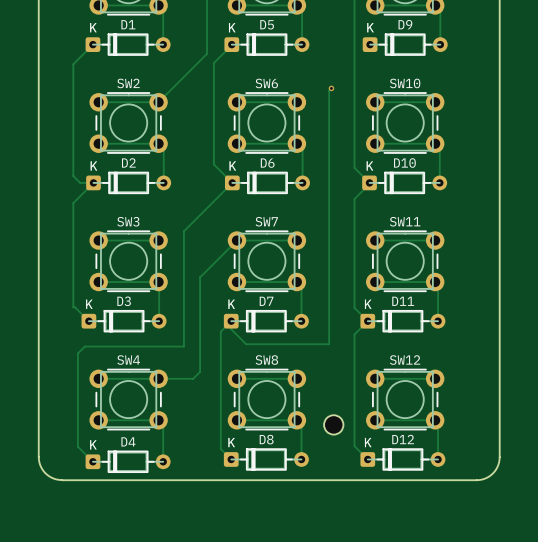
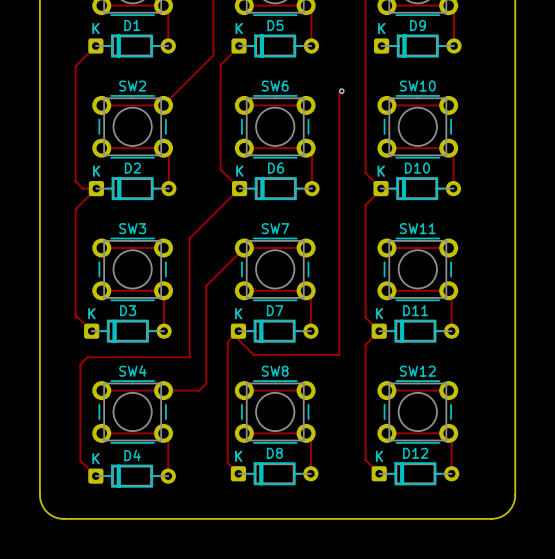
part: (333, 424) -> none
board edge: (38, 457) (40, 464) (45, 473) (54, 478) (61, 480) -> none
board edge: (499, 457) (497, 467) (492, 473) (486, 477) (476, 480) (61, 480) -> (515, 471) (515, 497) (512, 505) (504, 515) (491, 518) (61, 518) (48, 513) (42, 505) (40, 497) (39, 471)

